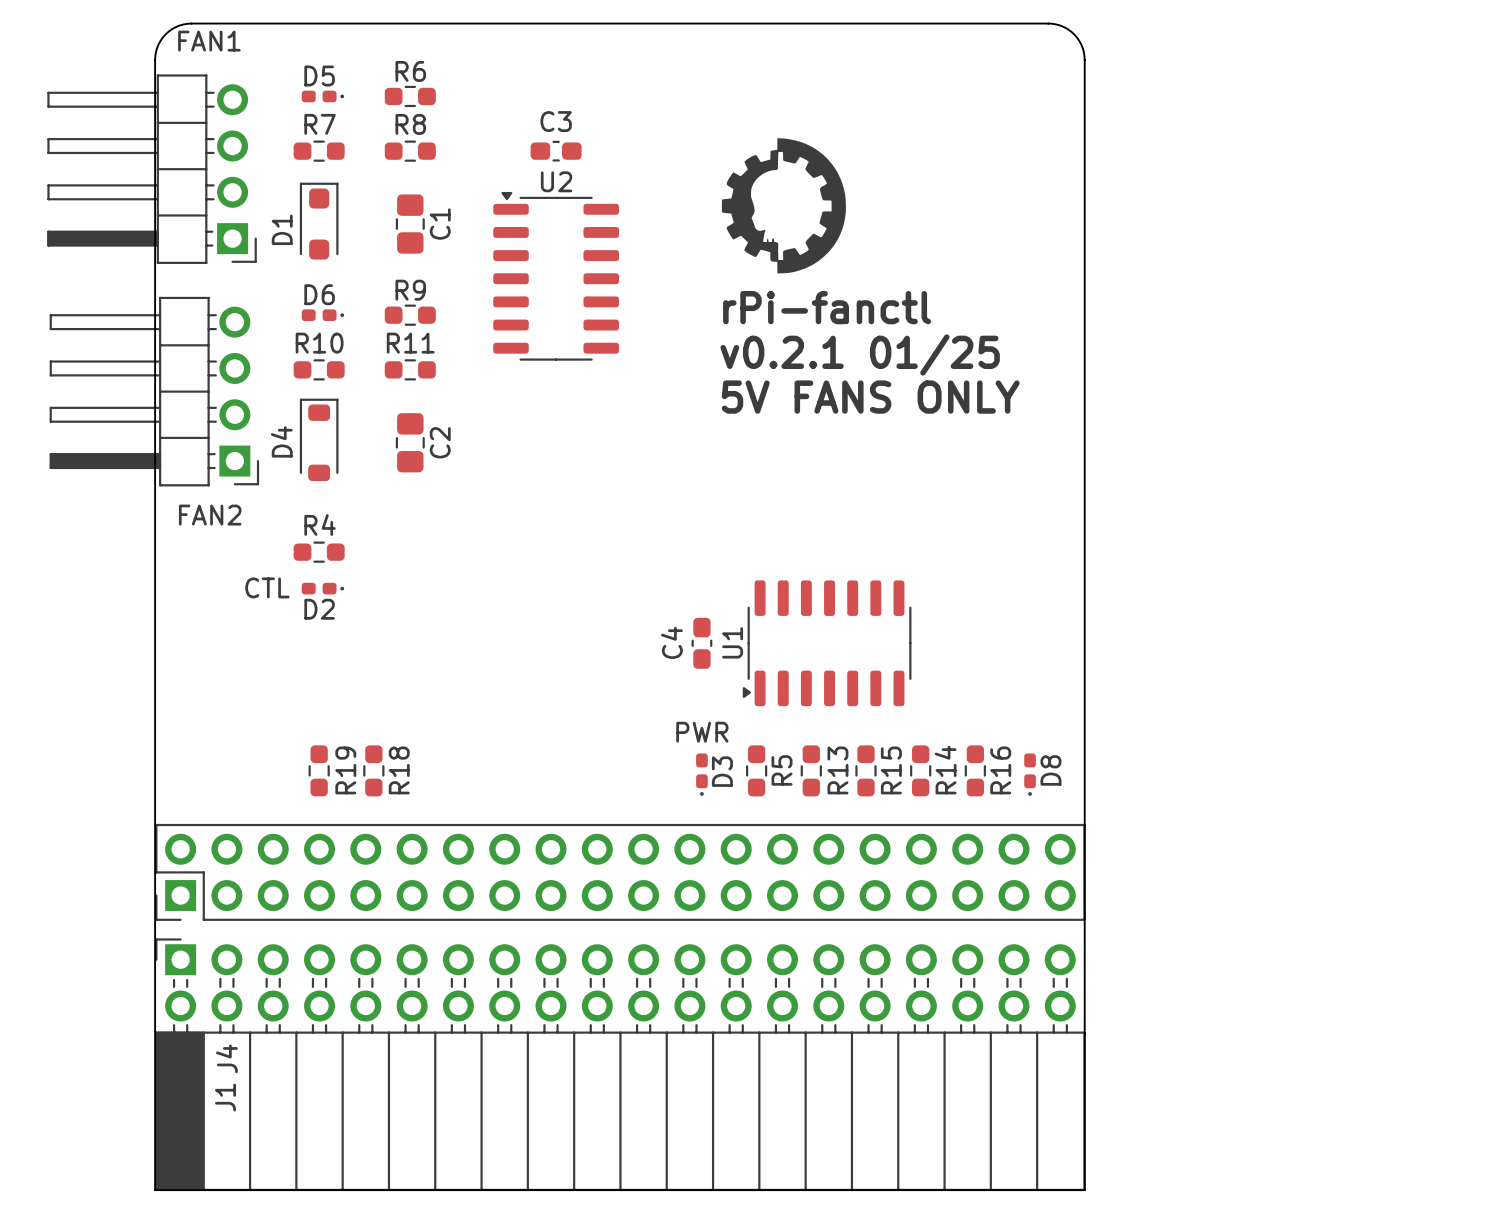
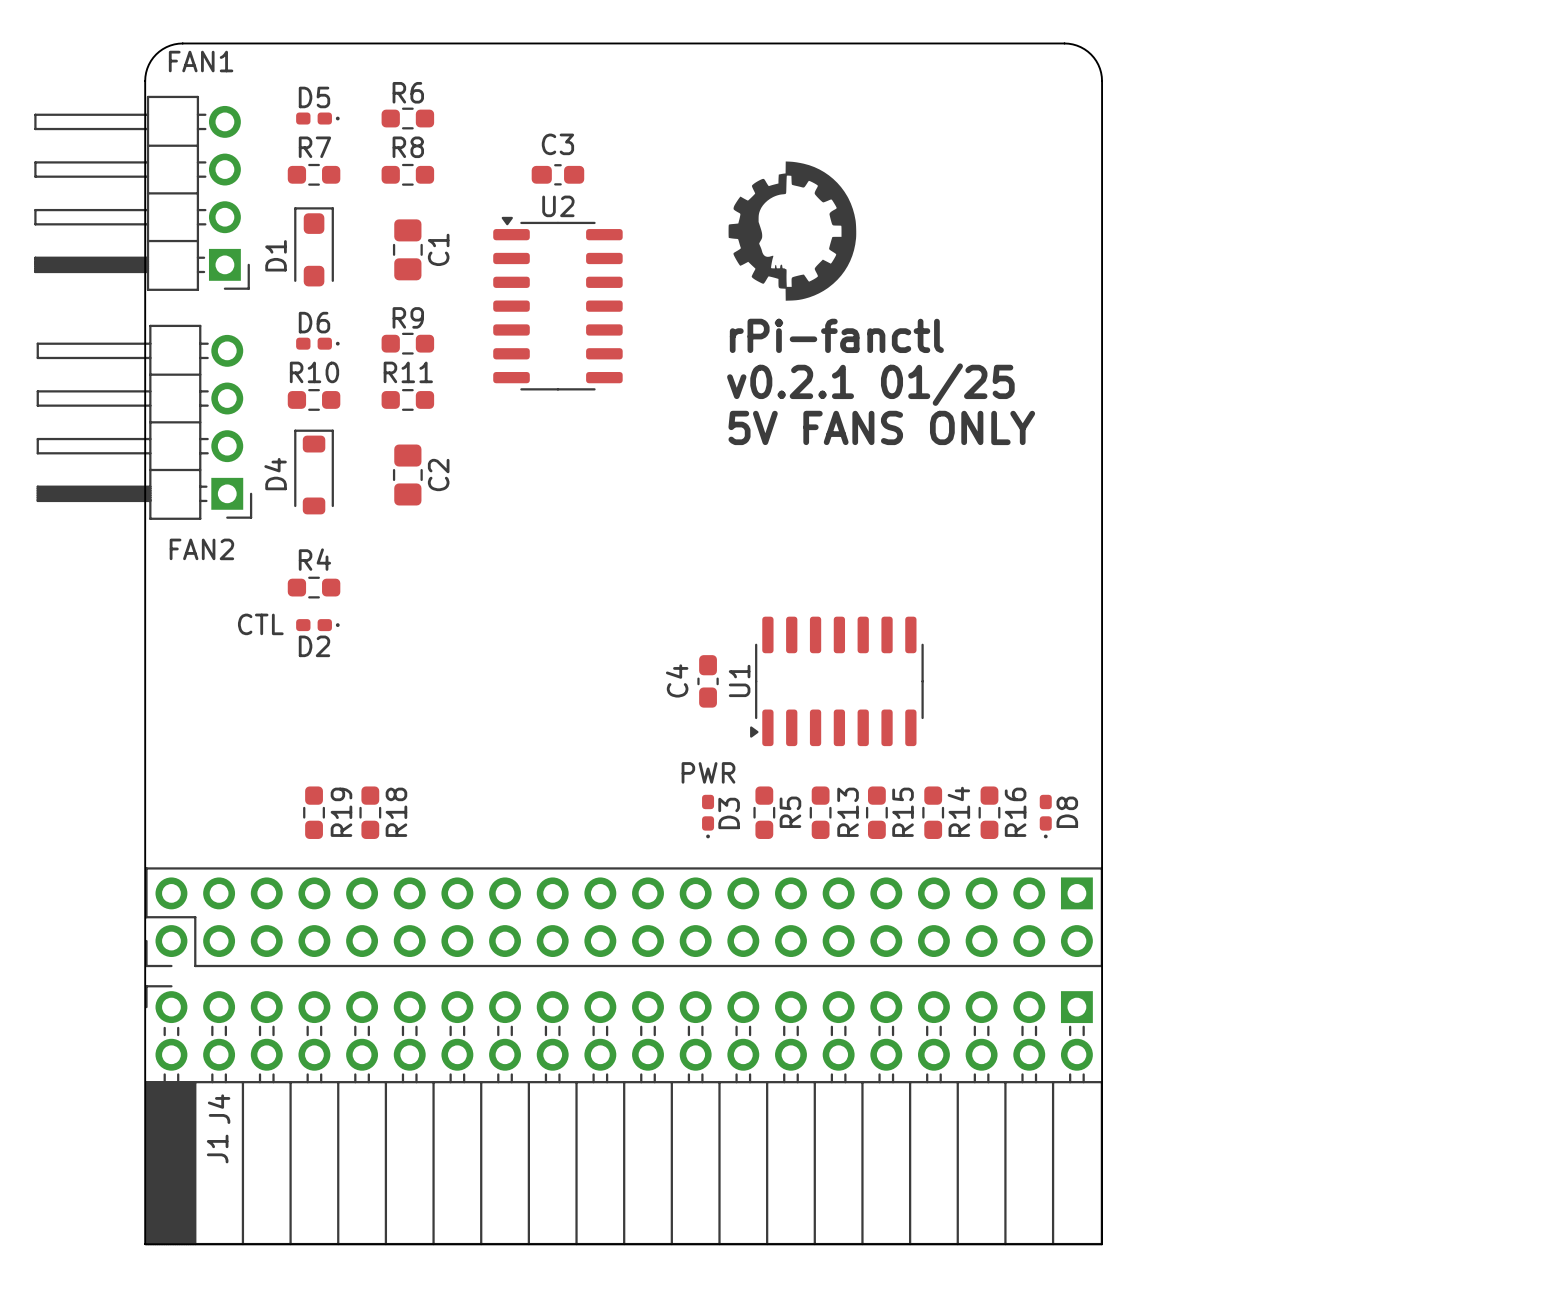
J4 footprint: [155, 823, 1086, 921] -> [145, 867, 1103, 968]
J1 footprint: [155, 938, 1086, 1192] -> [145, 985, 1103, 1246]

